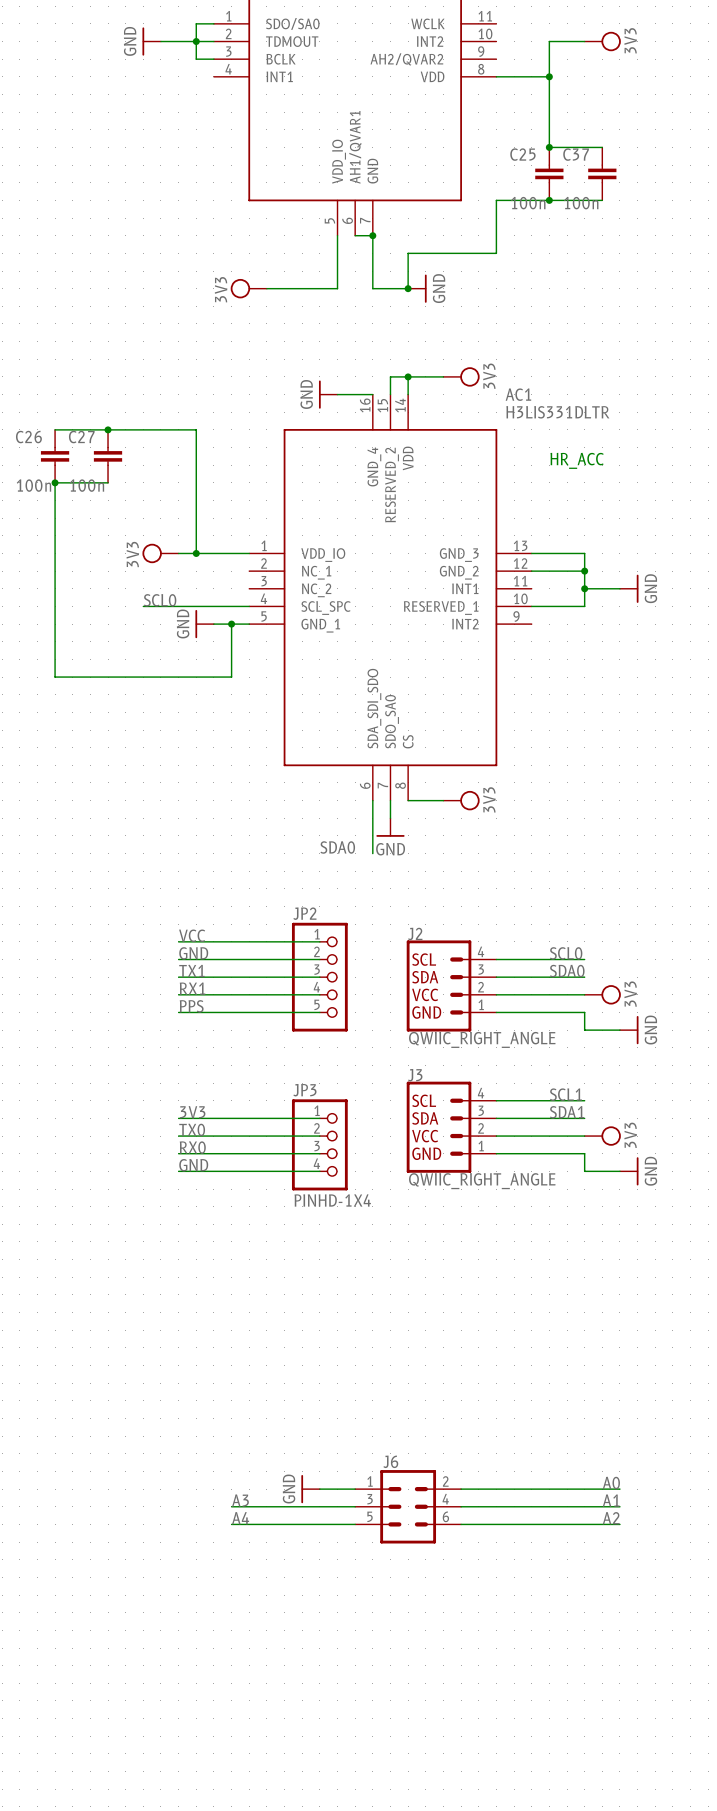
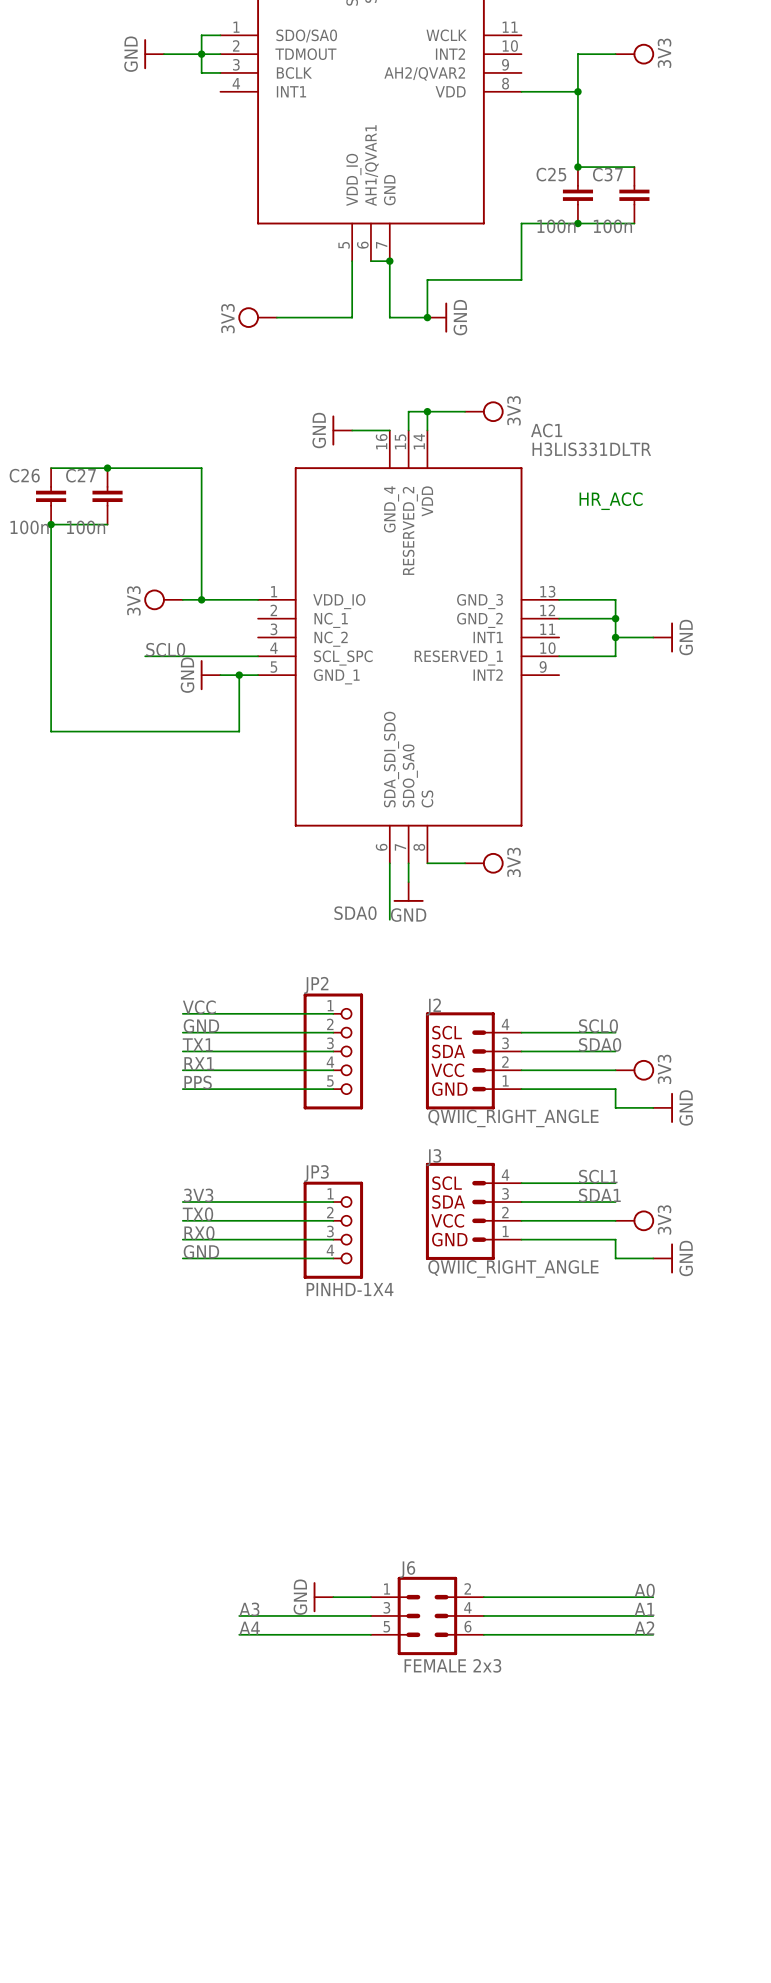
J6 value: none -> FEMALE 2x3 (452, 1665)

